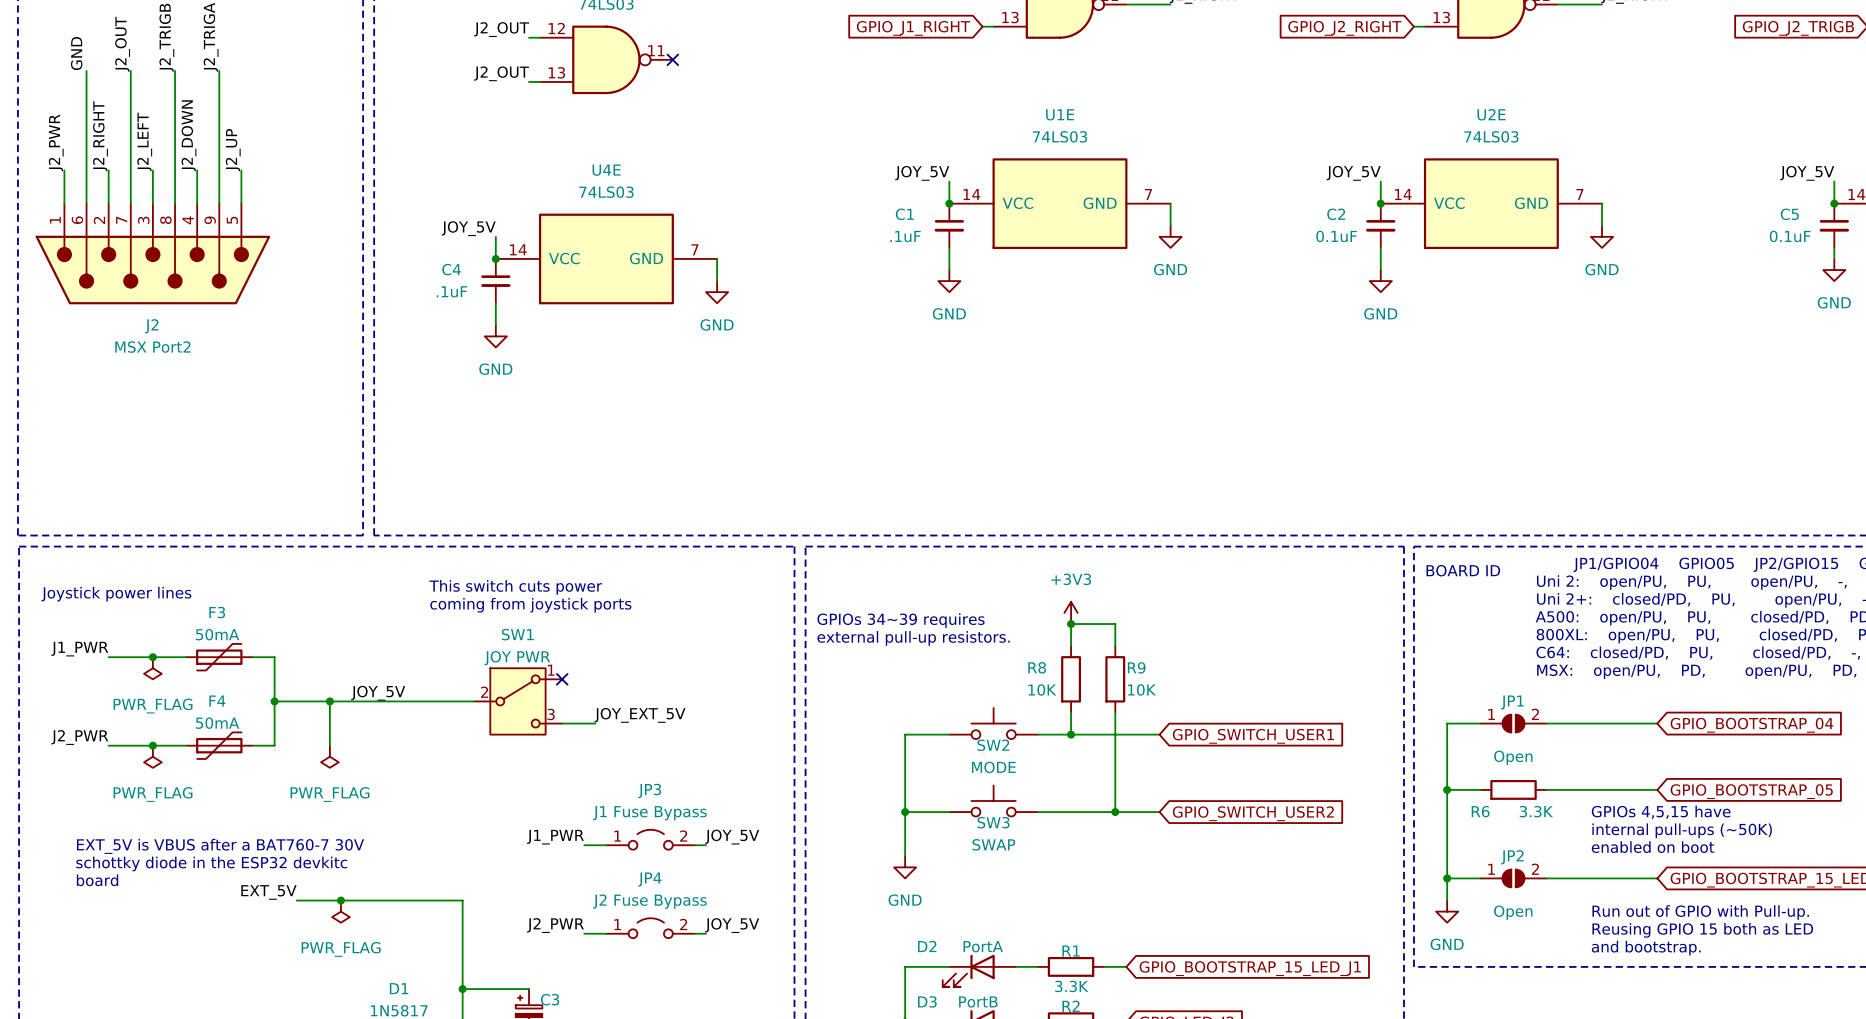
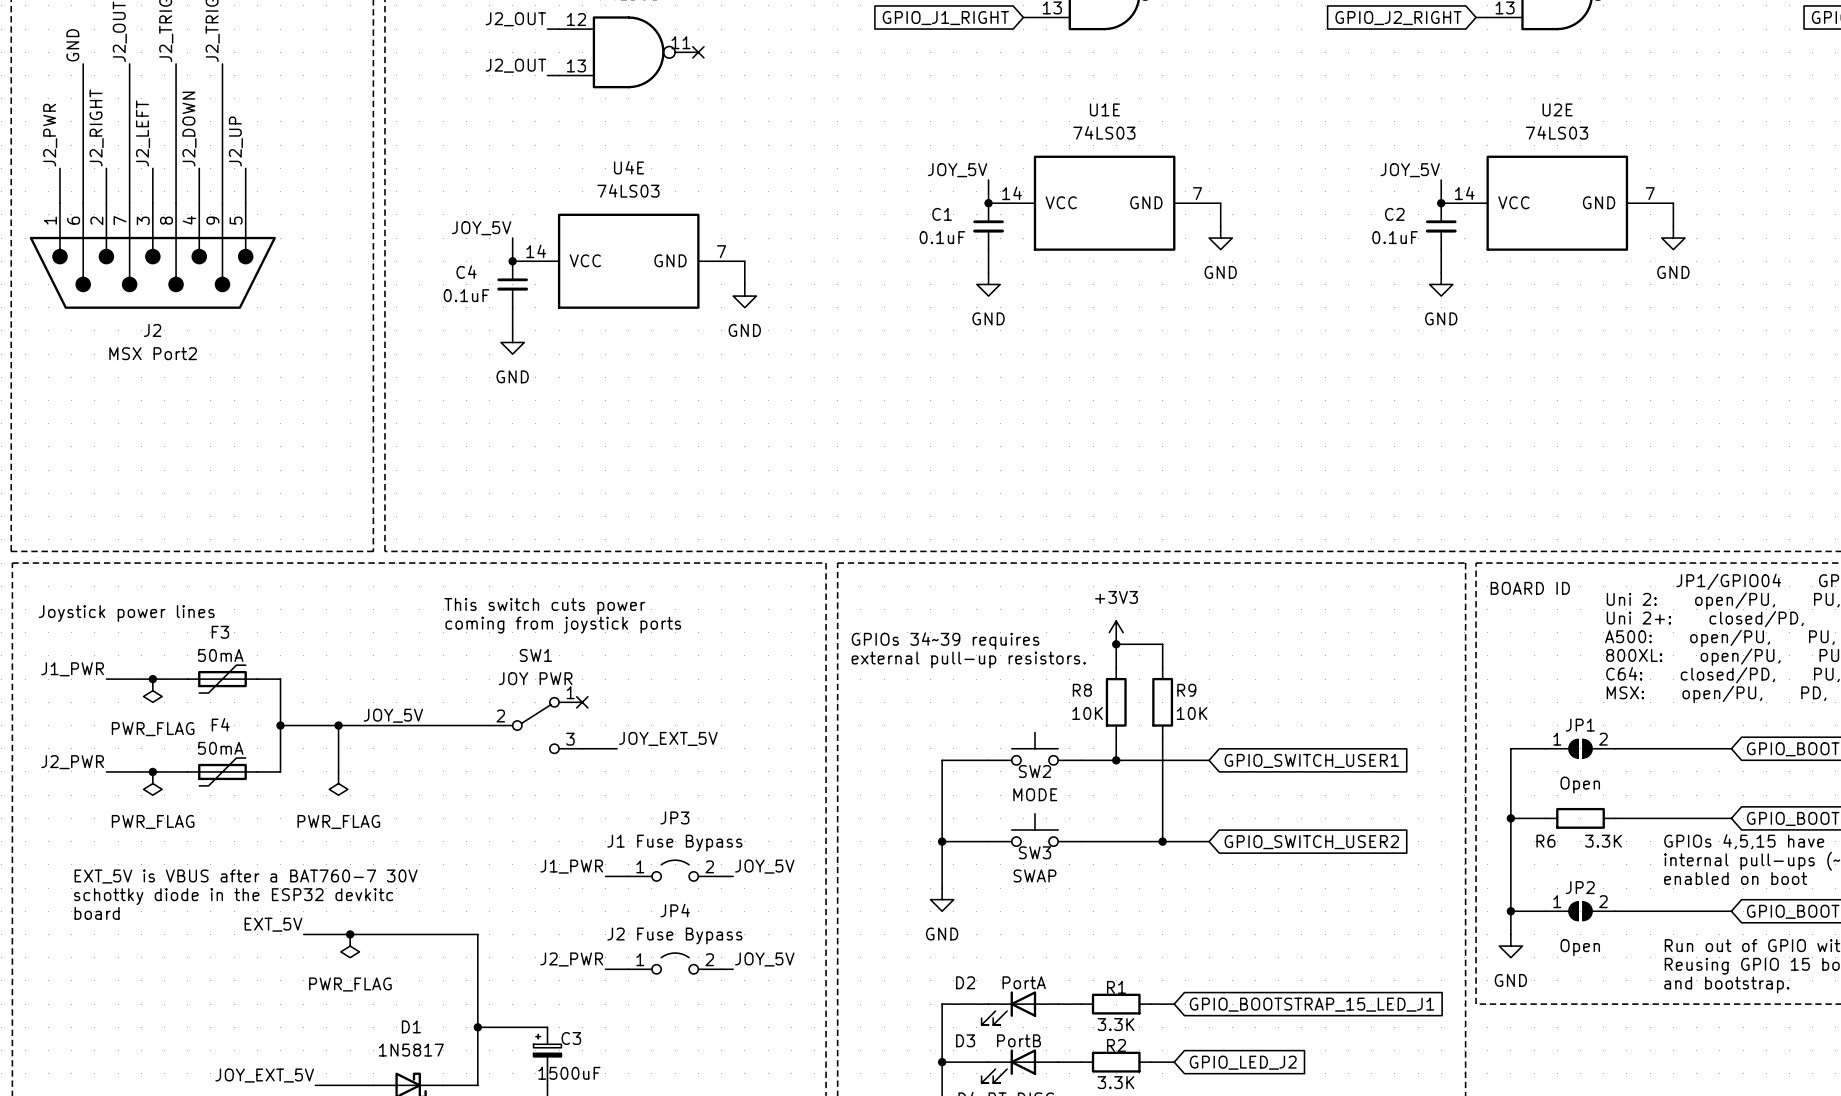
C1 value: .1uF (905, 236) -> 0.1uF (942, 237)
C4 value: .1uF (451, 291) -> 0.1uF (466, 295)
SW1 symbol: [473, 668, 563, 735] -> [489, 697, 583, 754]

